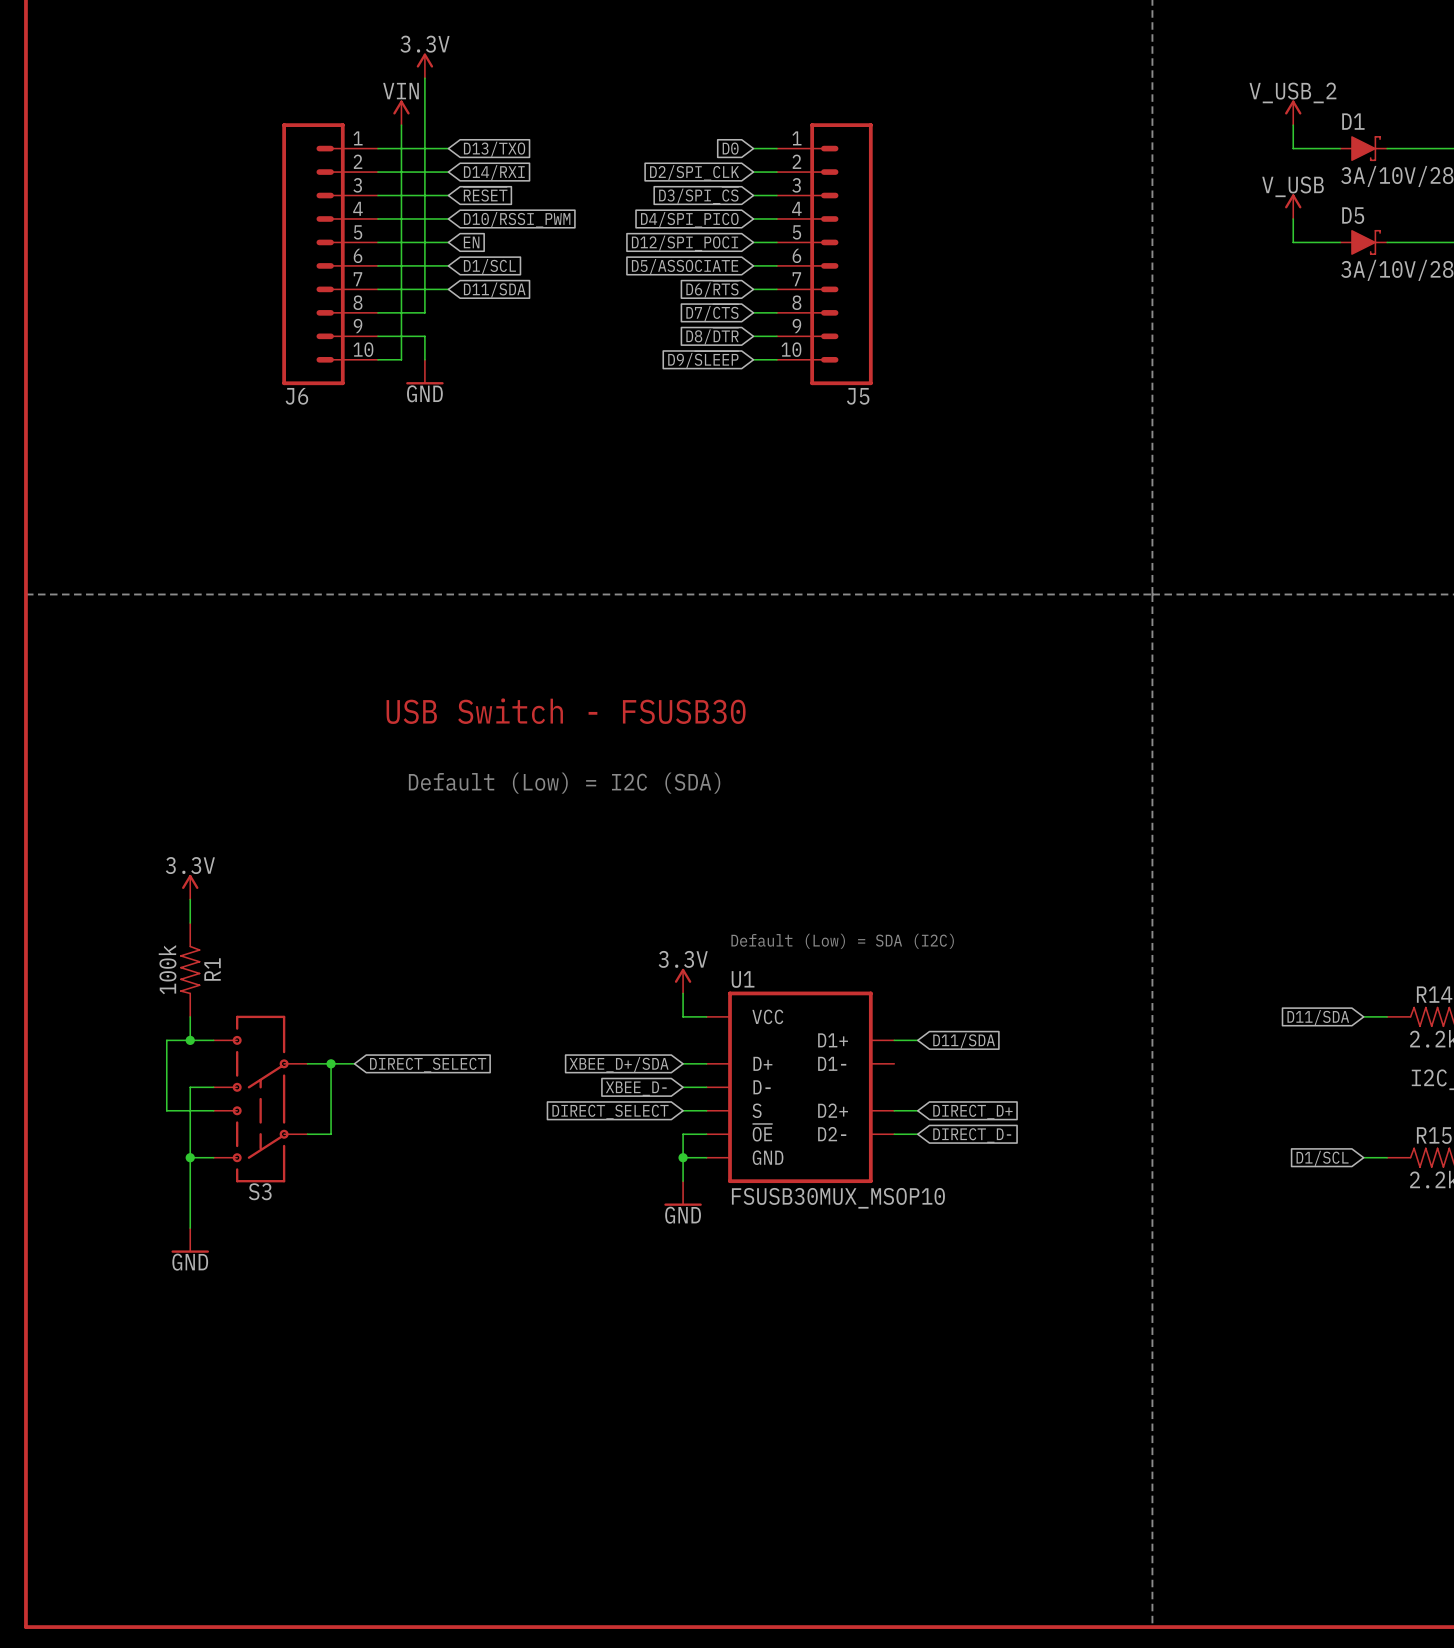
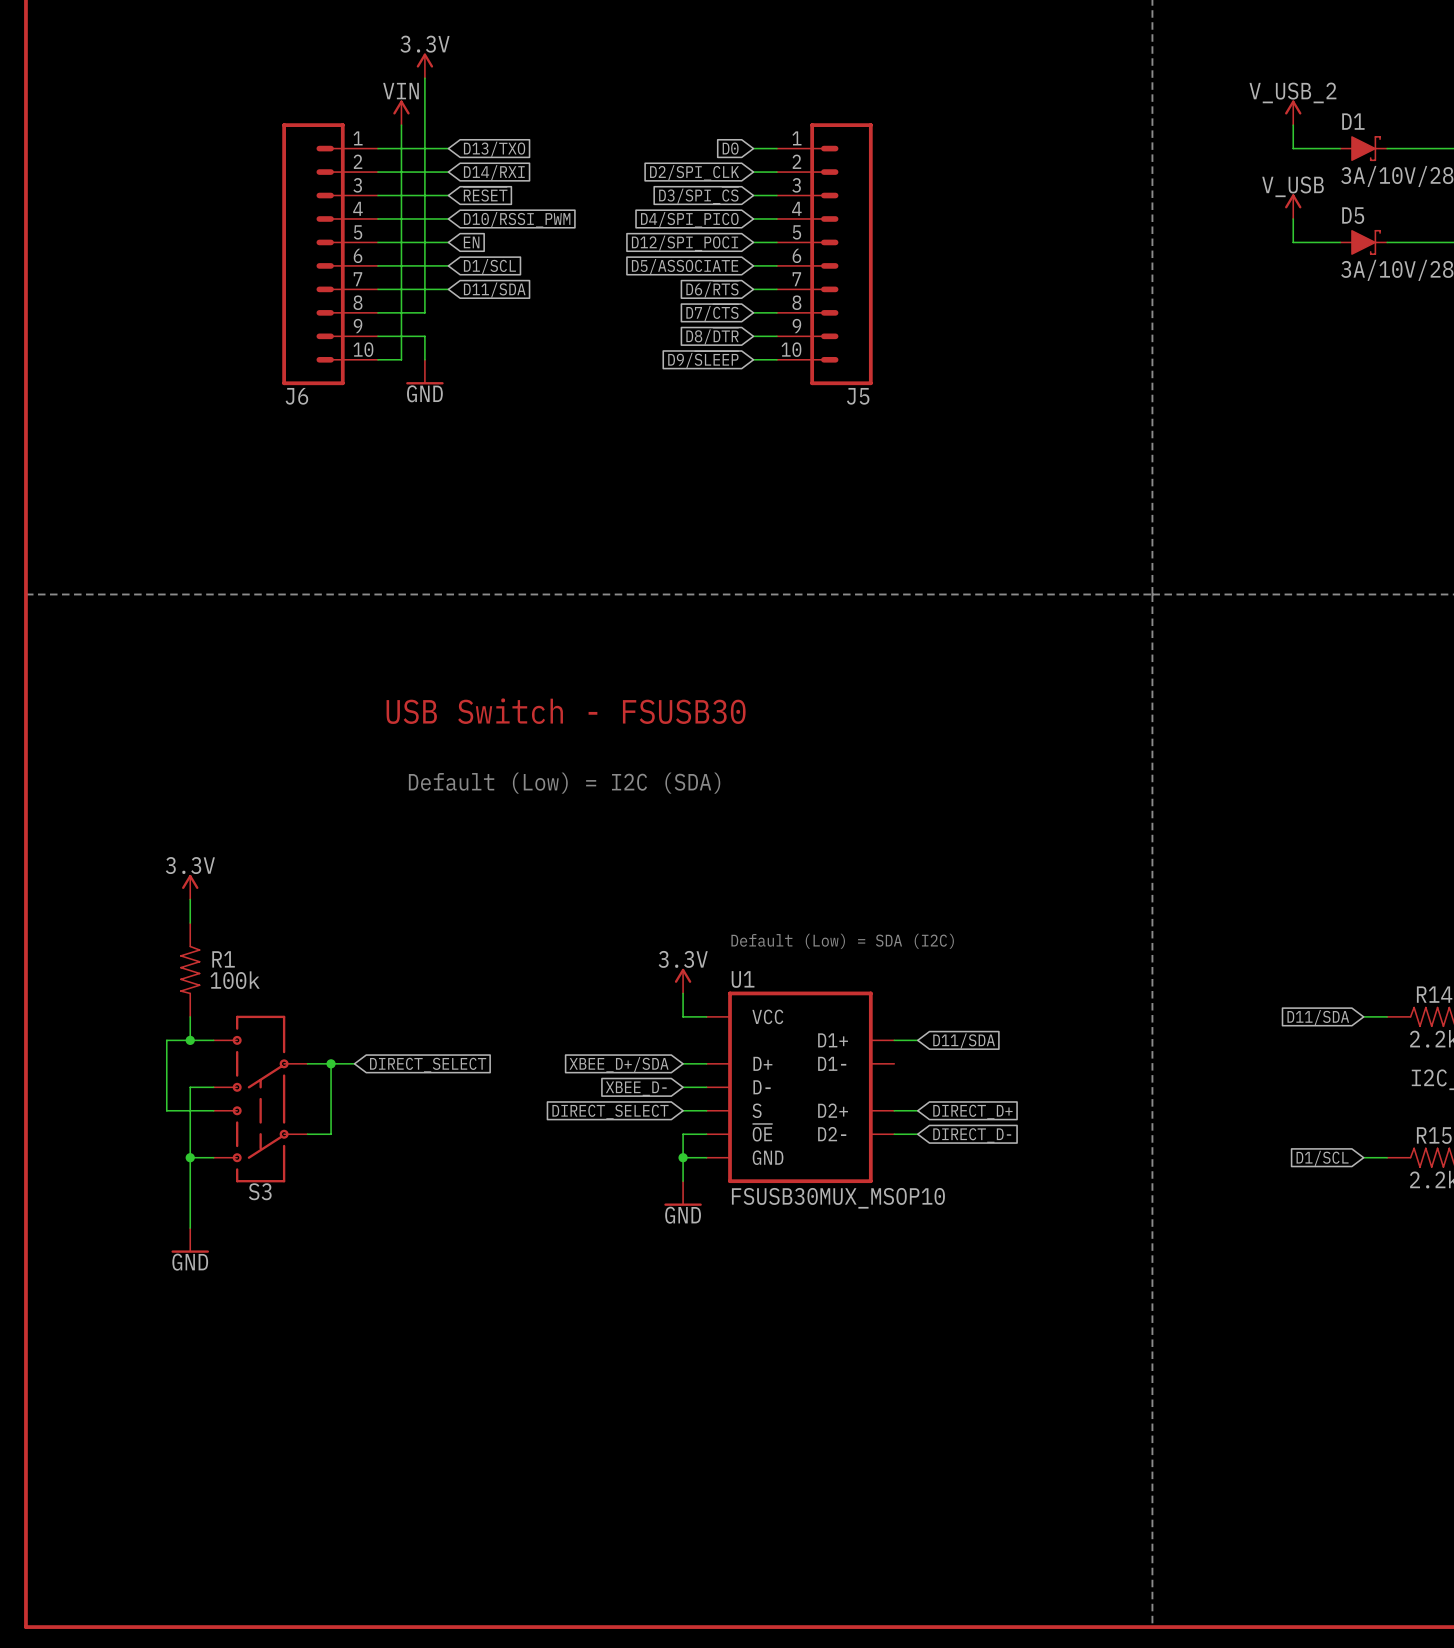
R1 value rotation: 0° (167, 969) -> 90° clockwise (235, 980)
R1 value position: 100k (167, 969) -> 100k (235, 980)
R1 name rotation: 0° (212, 969) -> 90° clockwise (223, 959)

